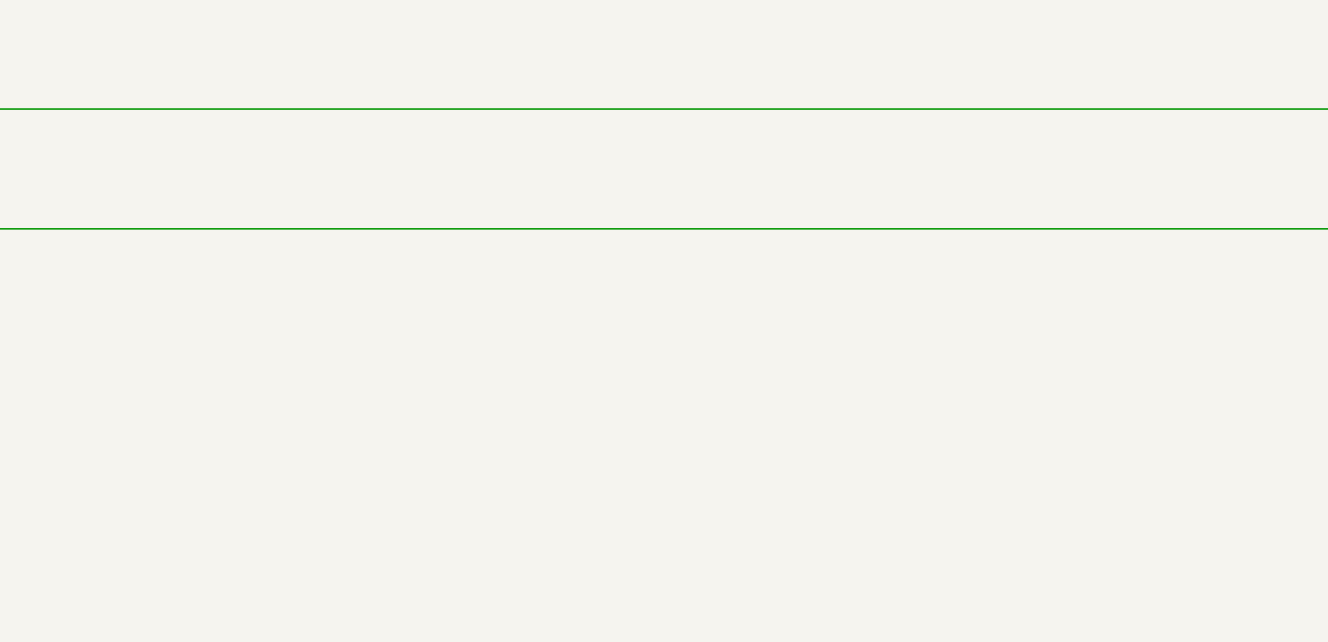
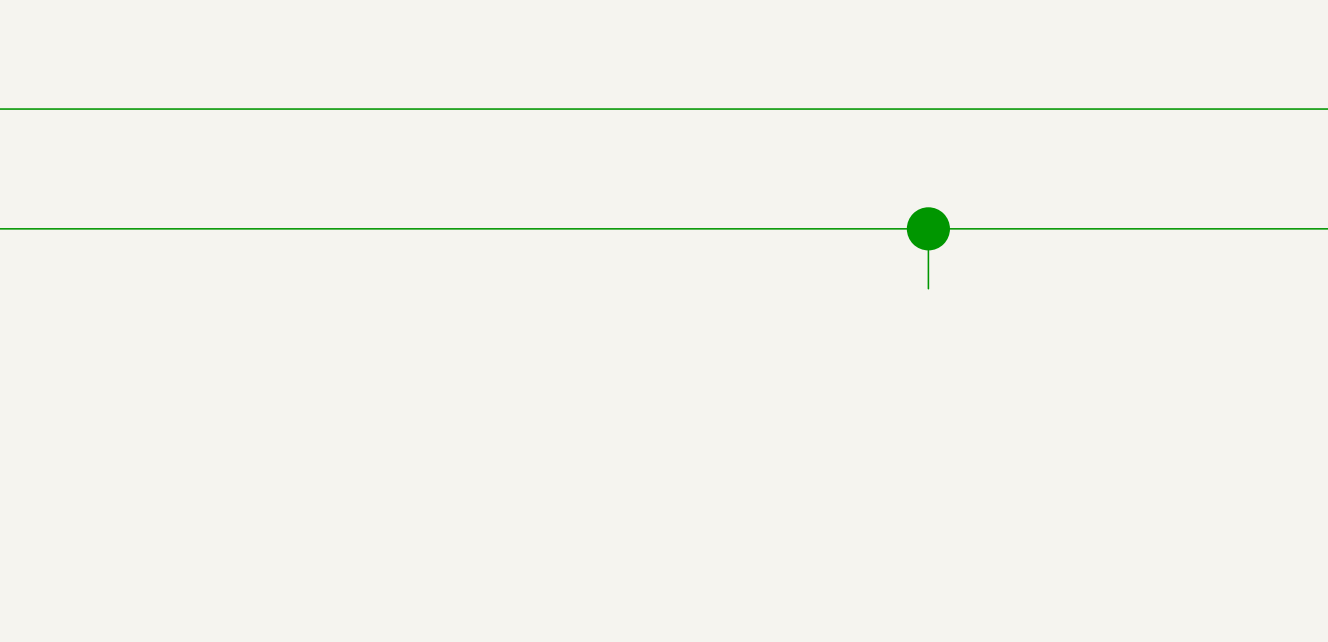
wire: none -> (928, 228) (928, 288)
junction: none -> (928, 228)

